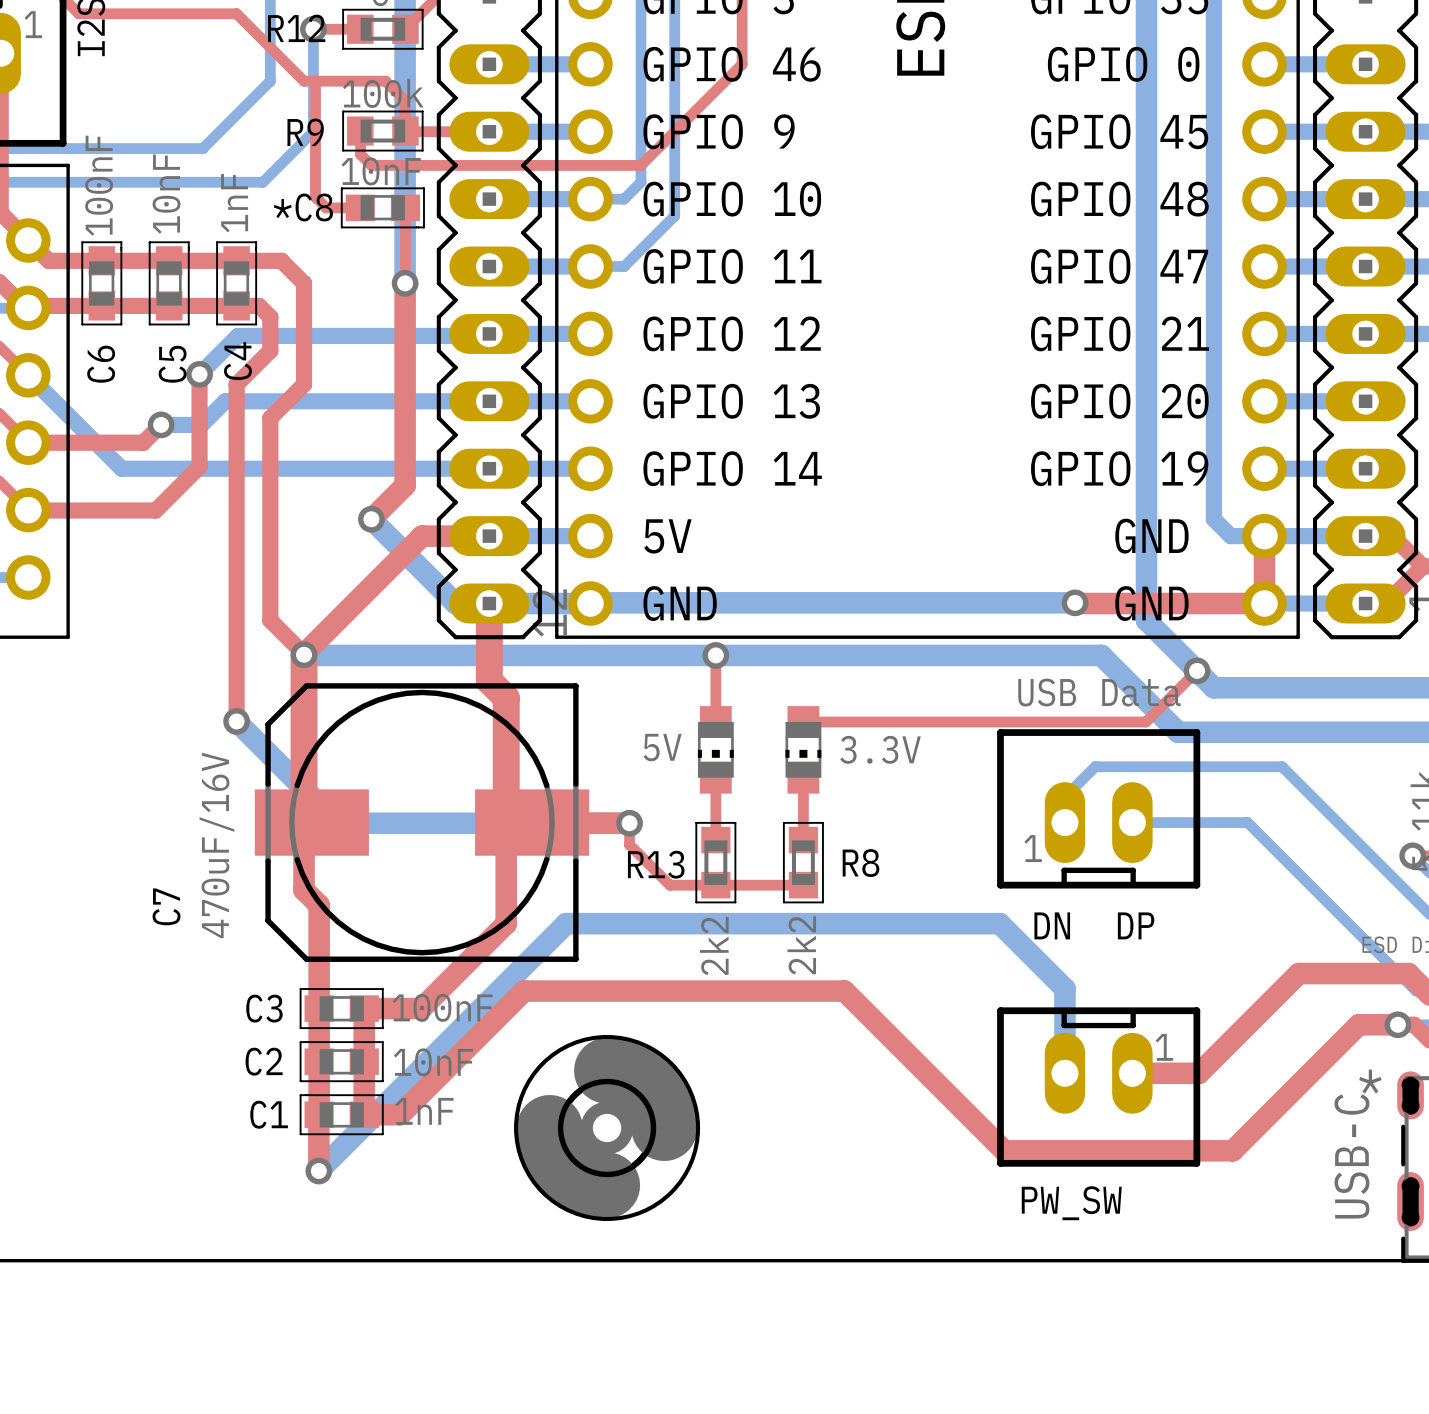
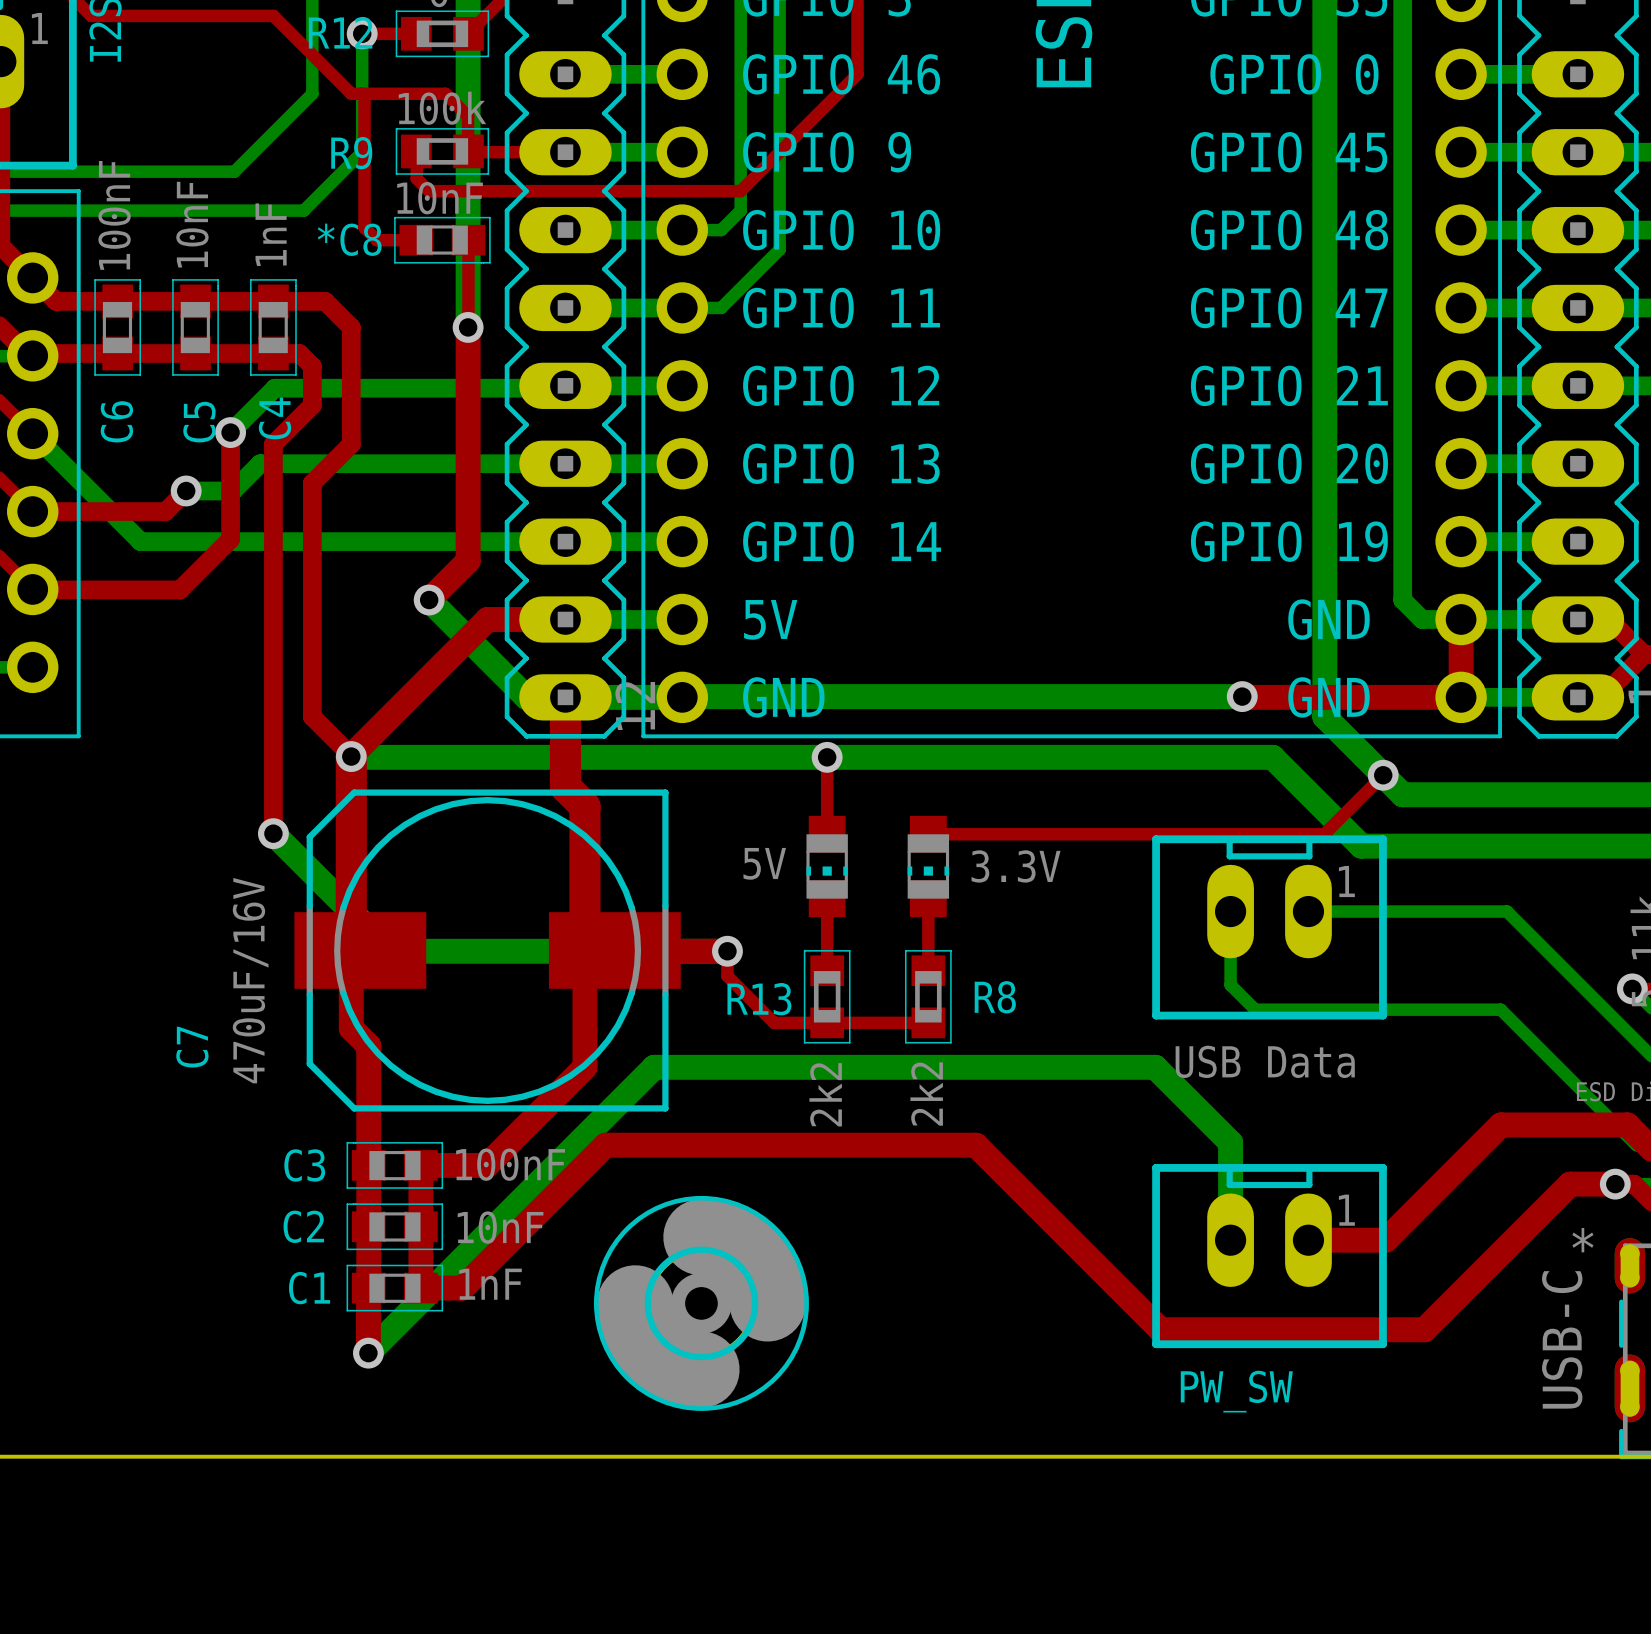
part value position: USB Data (1099, 692) -> USB Data (1265, 1061)
part footprint: [997, 729, 1201, 889] -> [1152, 835, 1387, 1020]
bottom track: (1304, 788) (1282, 766) (1095, 766) (1065, 796) (1064, 822) -> (1507, 911) (1308, 911)
bottom track: (1132, 822) (1247, 822) (1298, 873) -> (1230, 911) (1230, 985) (1255, 1009) (1500, 1009)
text: DN DP (1094, 925) -> none

